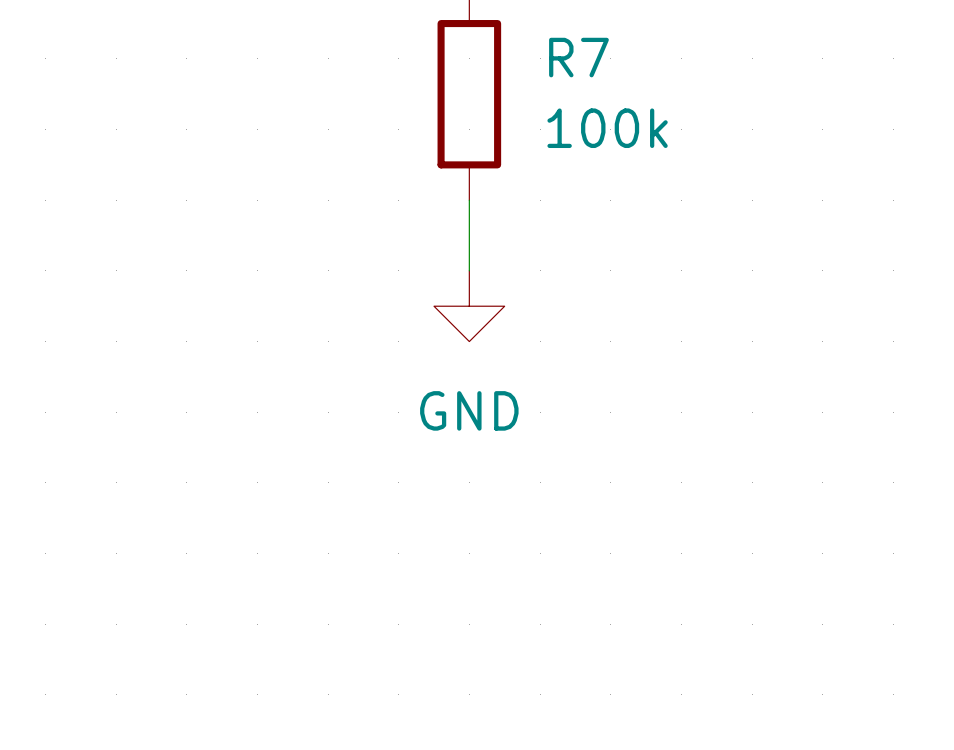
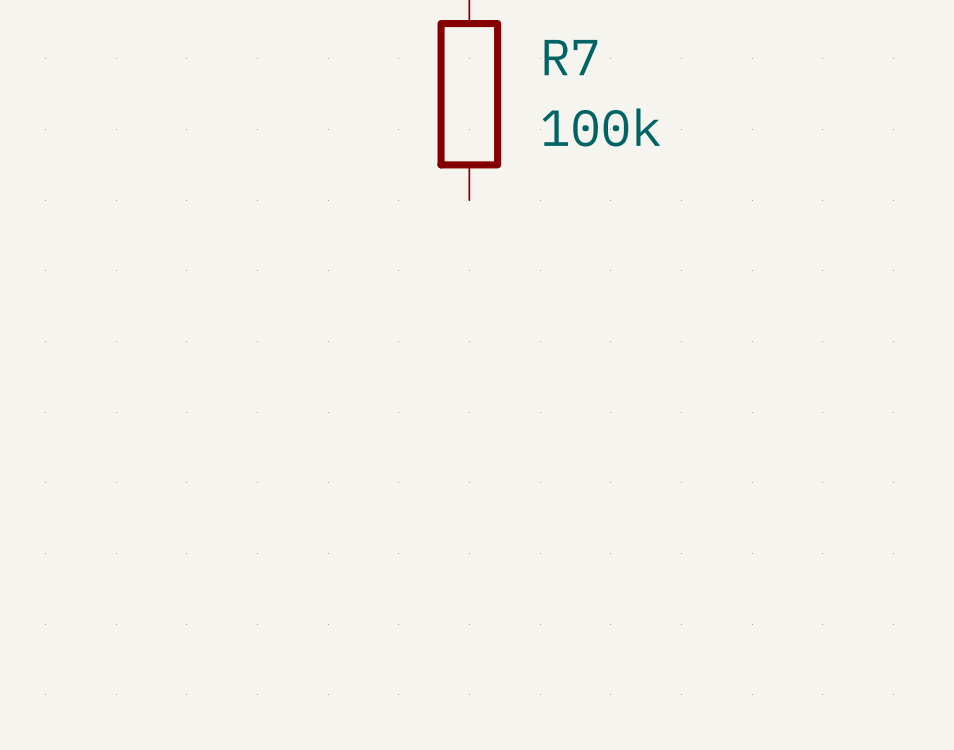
wire: (469, 200) (469, 270) -> none
power symbol: GND (469, 306) -> none

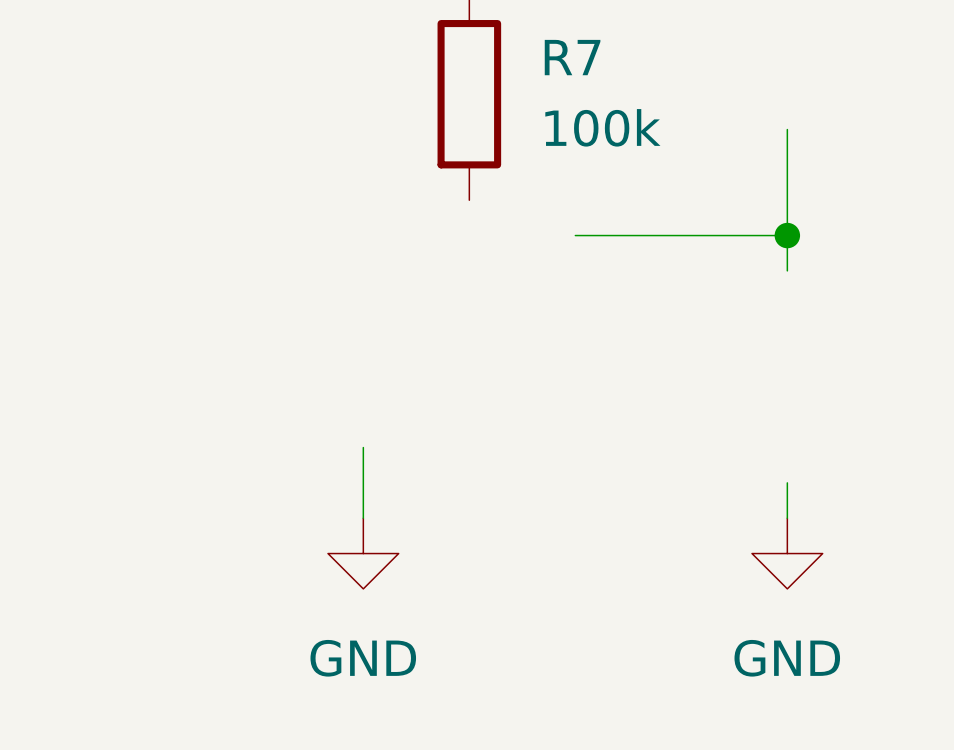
wire: none -> (787, 129) (787, 270)
wire: none -> (575, 235) (787, 235)
junction: none -> (787, 235)
wire: none -> (363, 447) (363, 518)
wire: none -> (787, 482) (787, 518)
power symbol: none -> GND (363, 553)
power symbol: none -> GND (787, 553)

